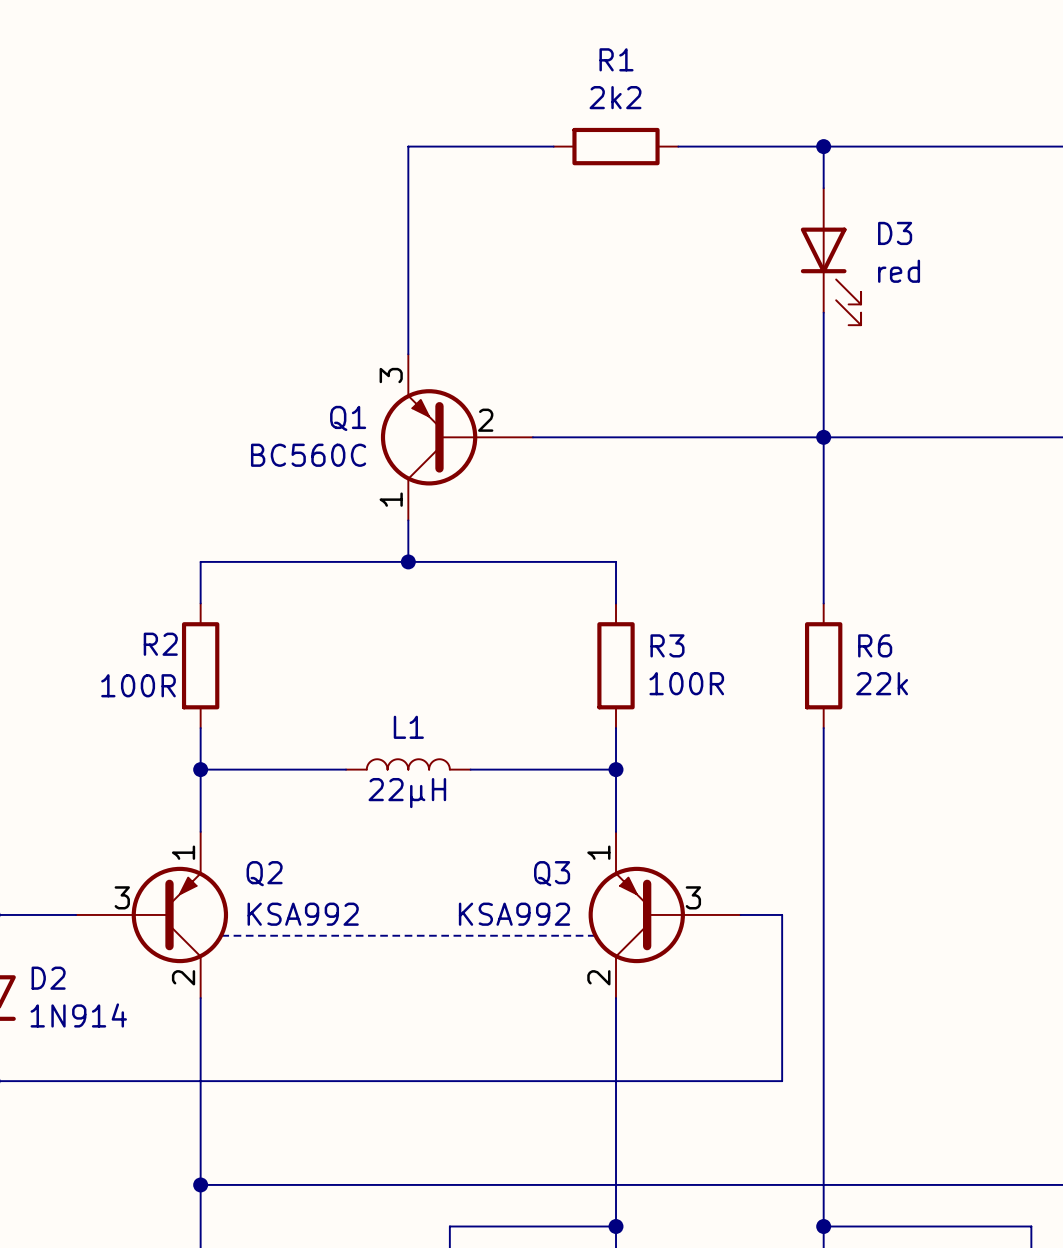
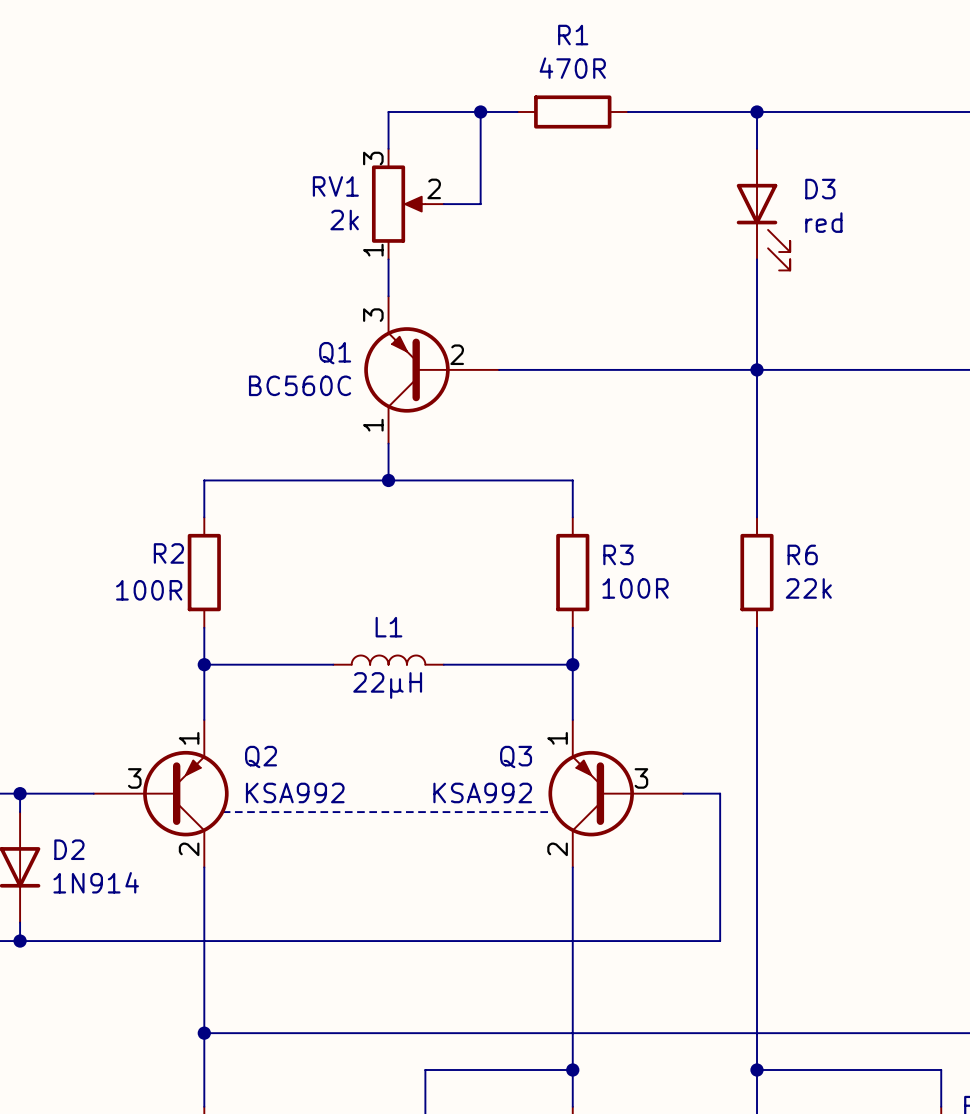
R1 value: 2k2 (615, 97) -> 470R (572, 68)
wire: none -> (480, 111) (480, 204) (443, 204)
junction: none -> (480, 111)
wire: (408, 188) (408, 312) -> none
RV1: none -> 2k (407, 204)

